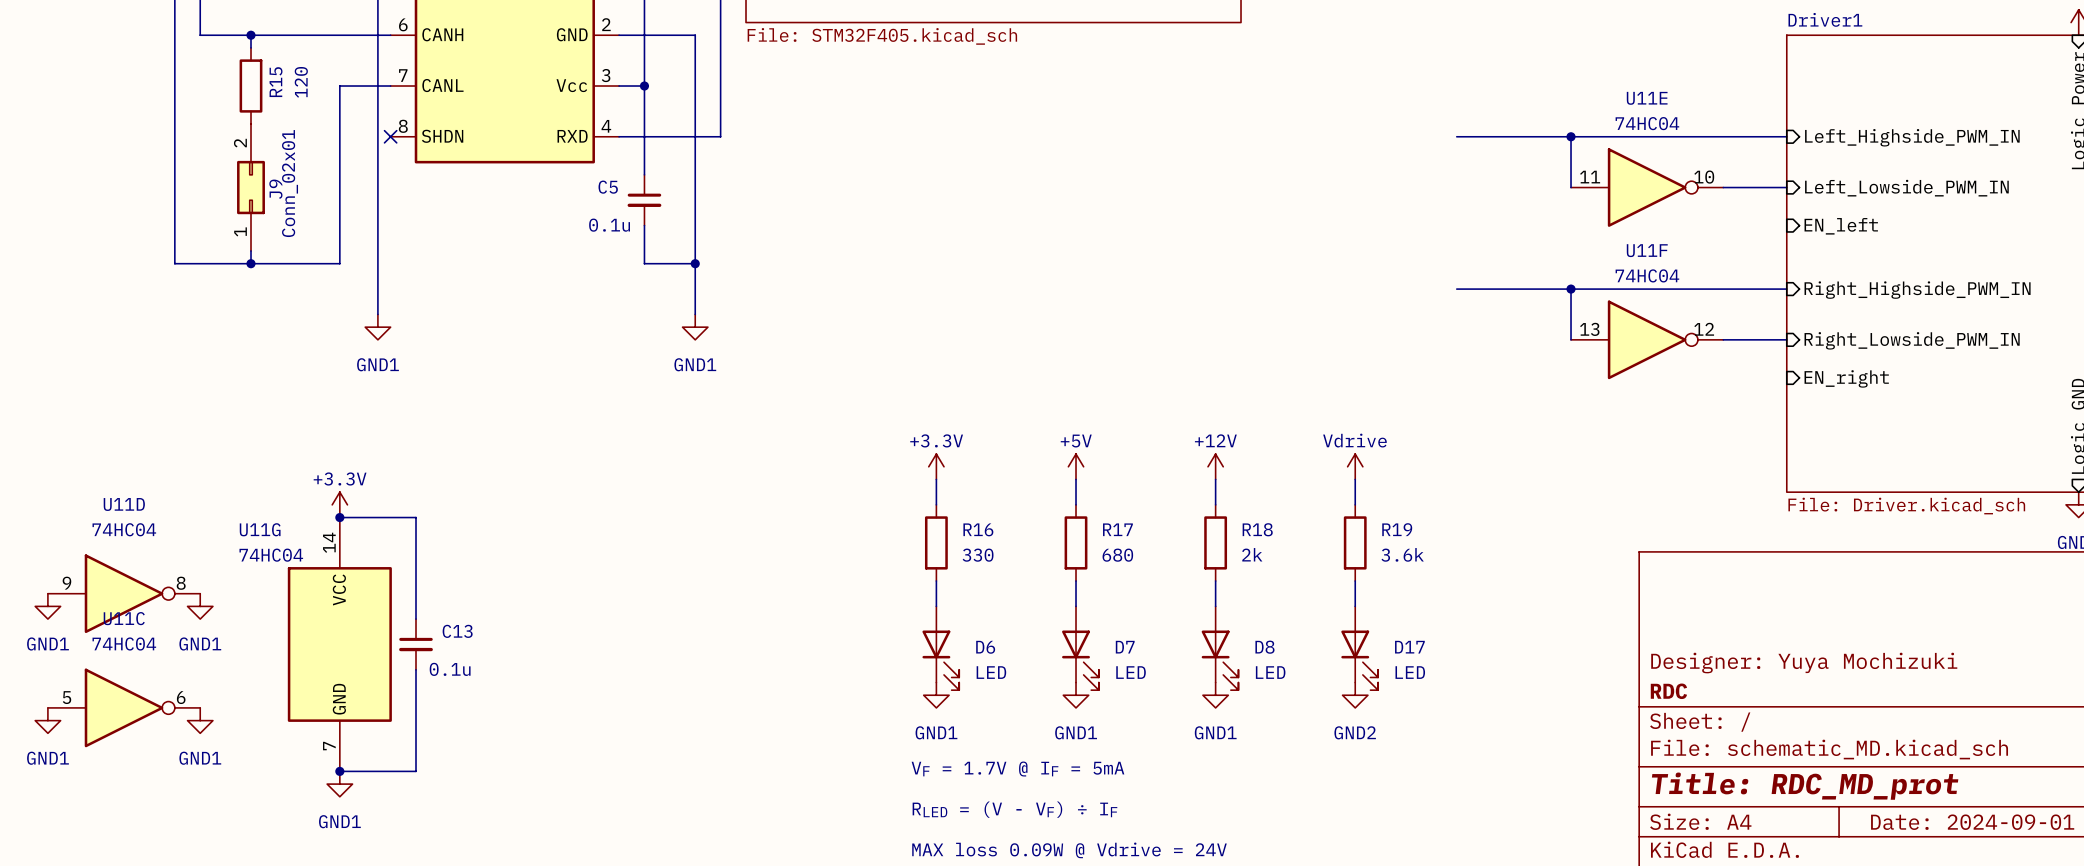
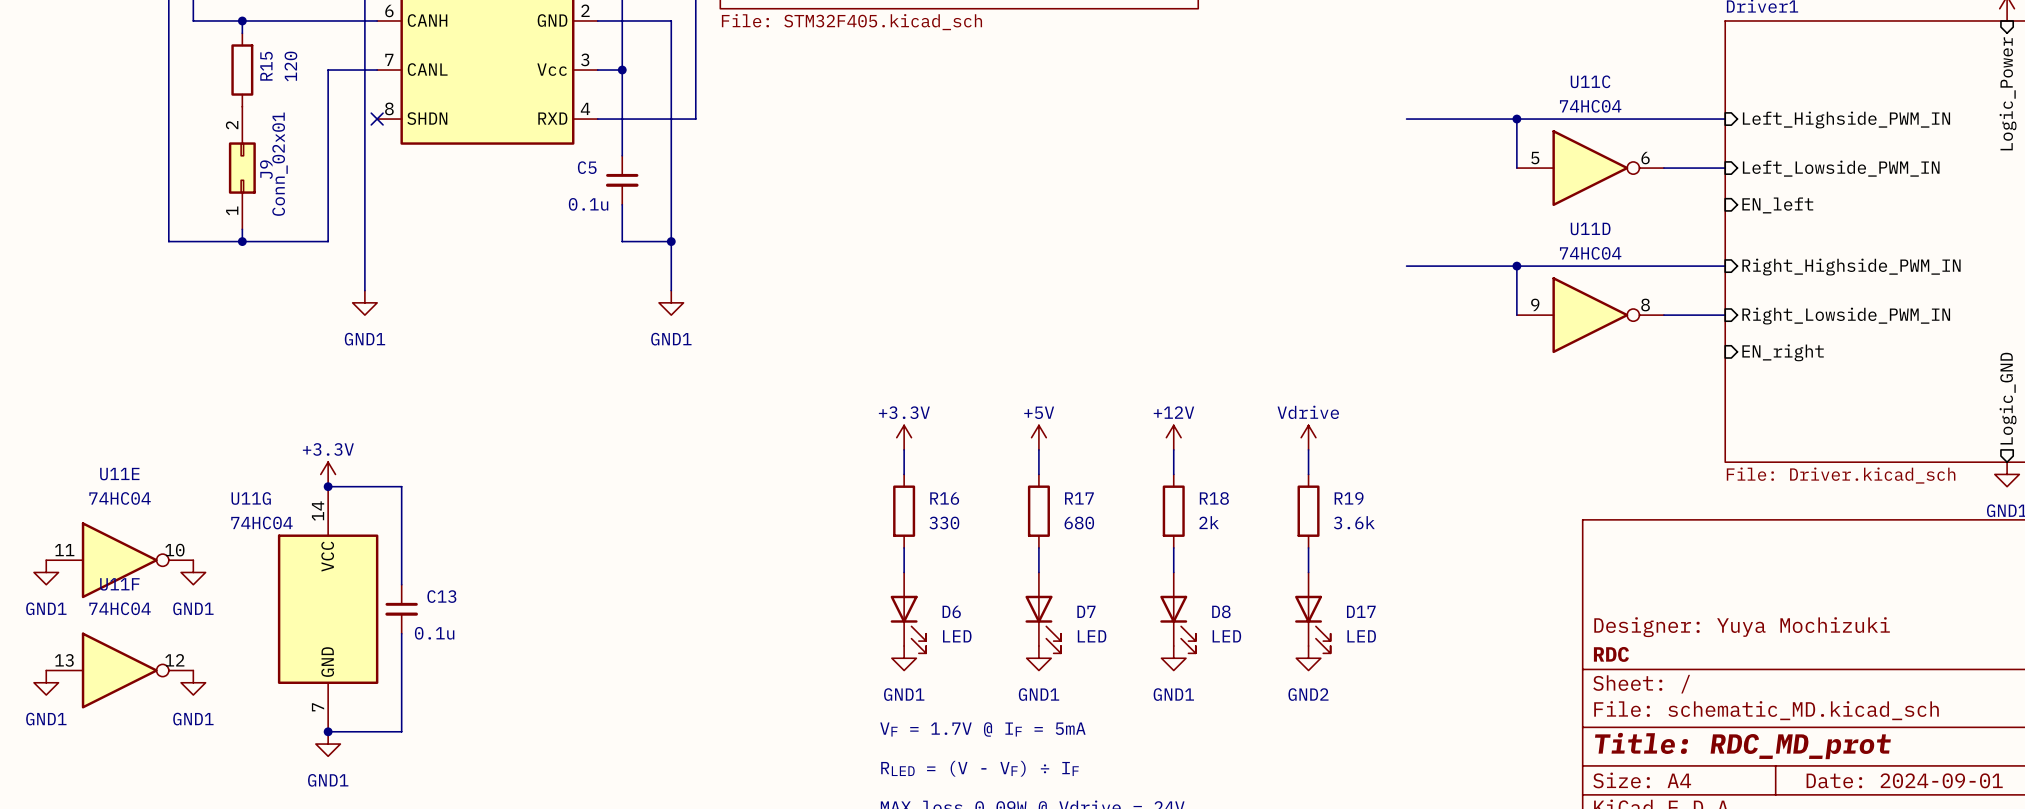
U11E position: (1647, 187) -> (119, 560)
U11F position: (1647, 339) -> (119, 670)
U11D position: (124, 593) -> (1590, 315)
U11C position: (124, 707) -> (1590, 168)

